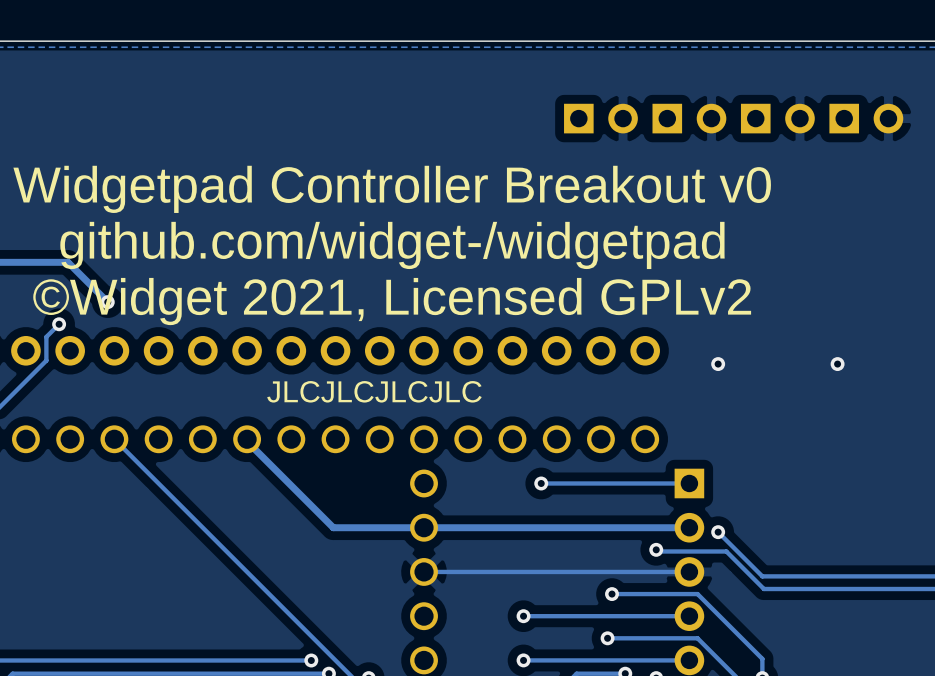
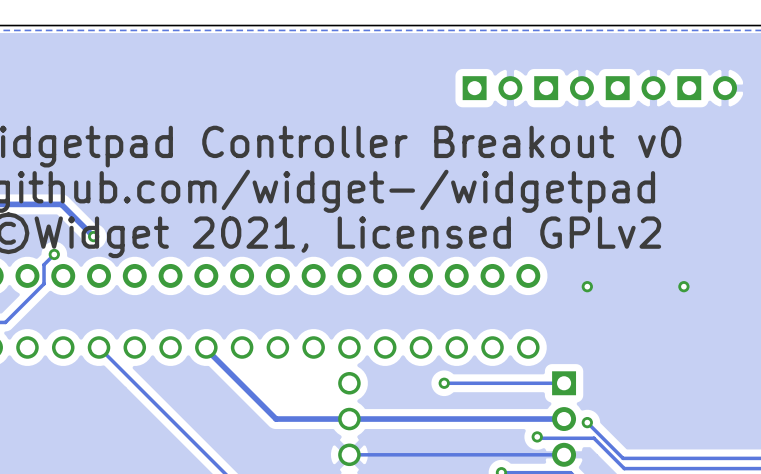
text: JLCJLCJLCJLC (374, 391) -> none

